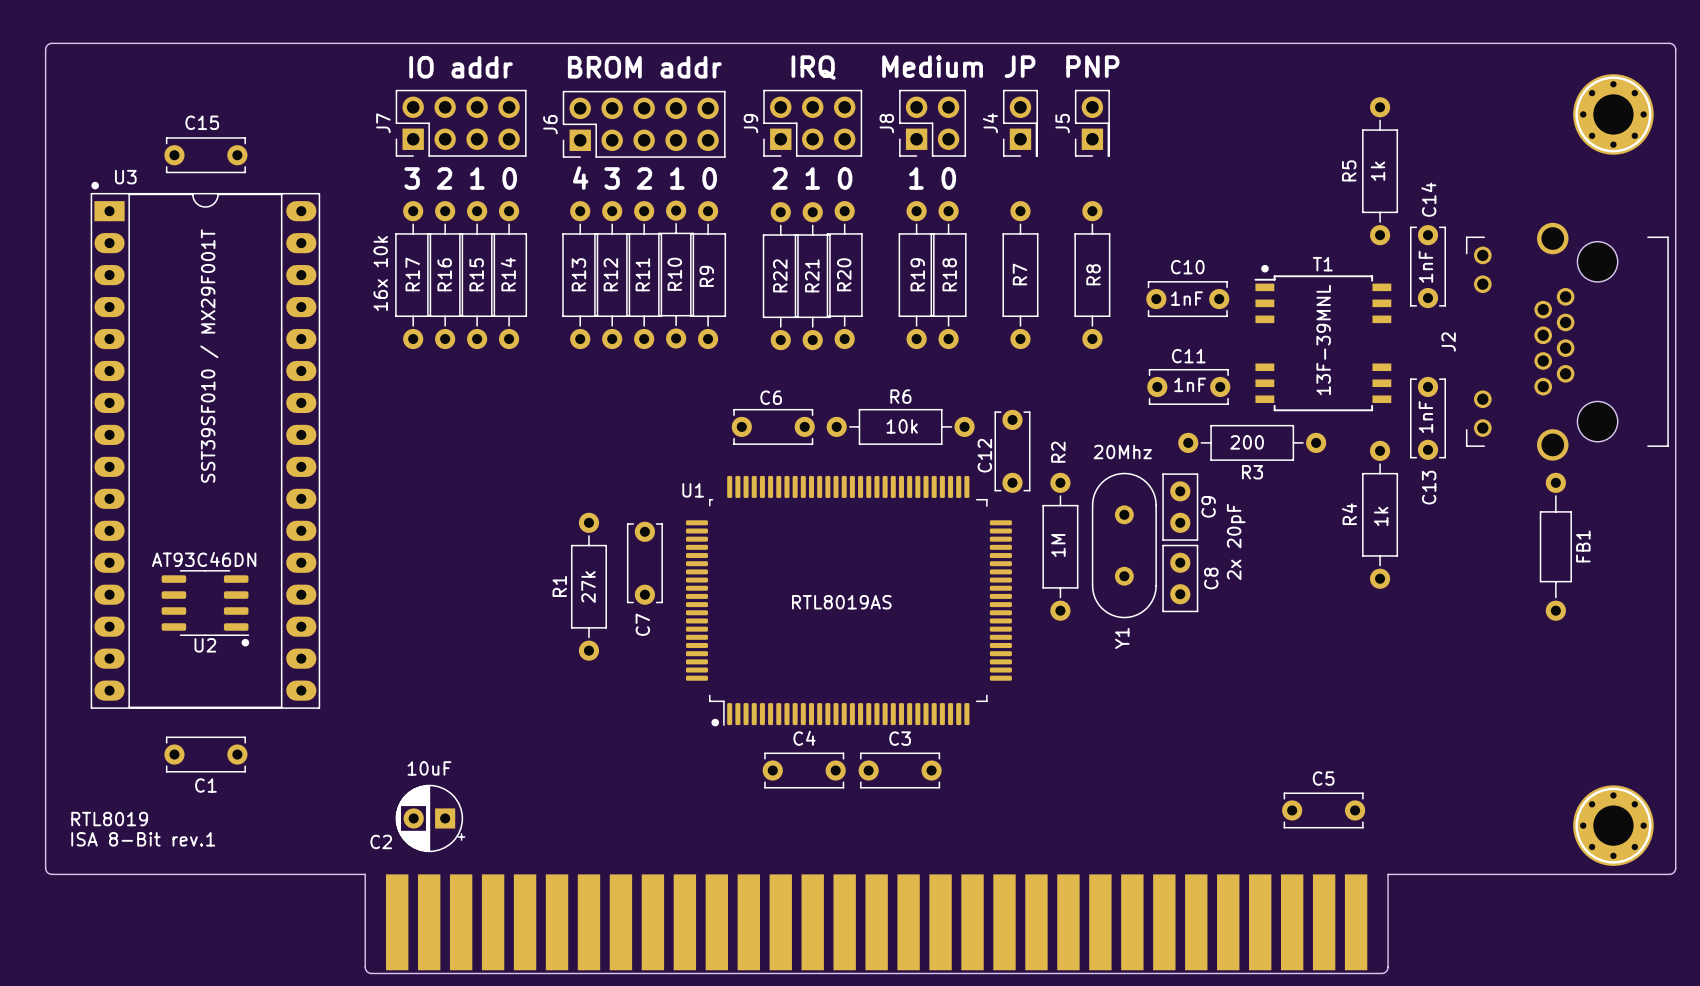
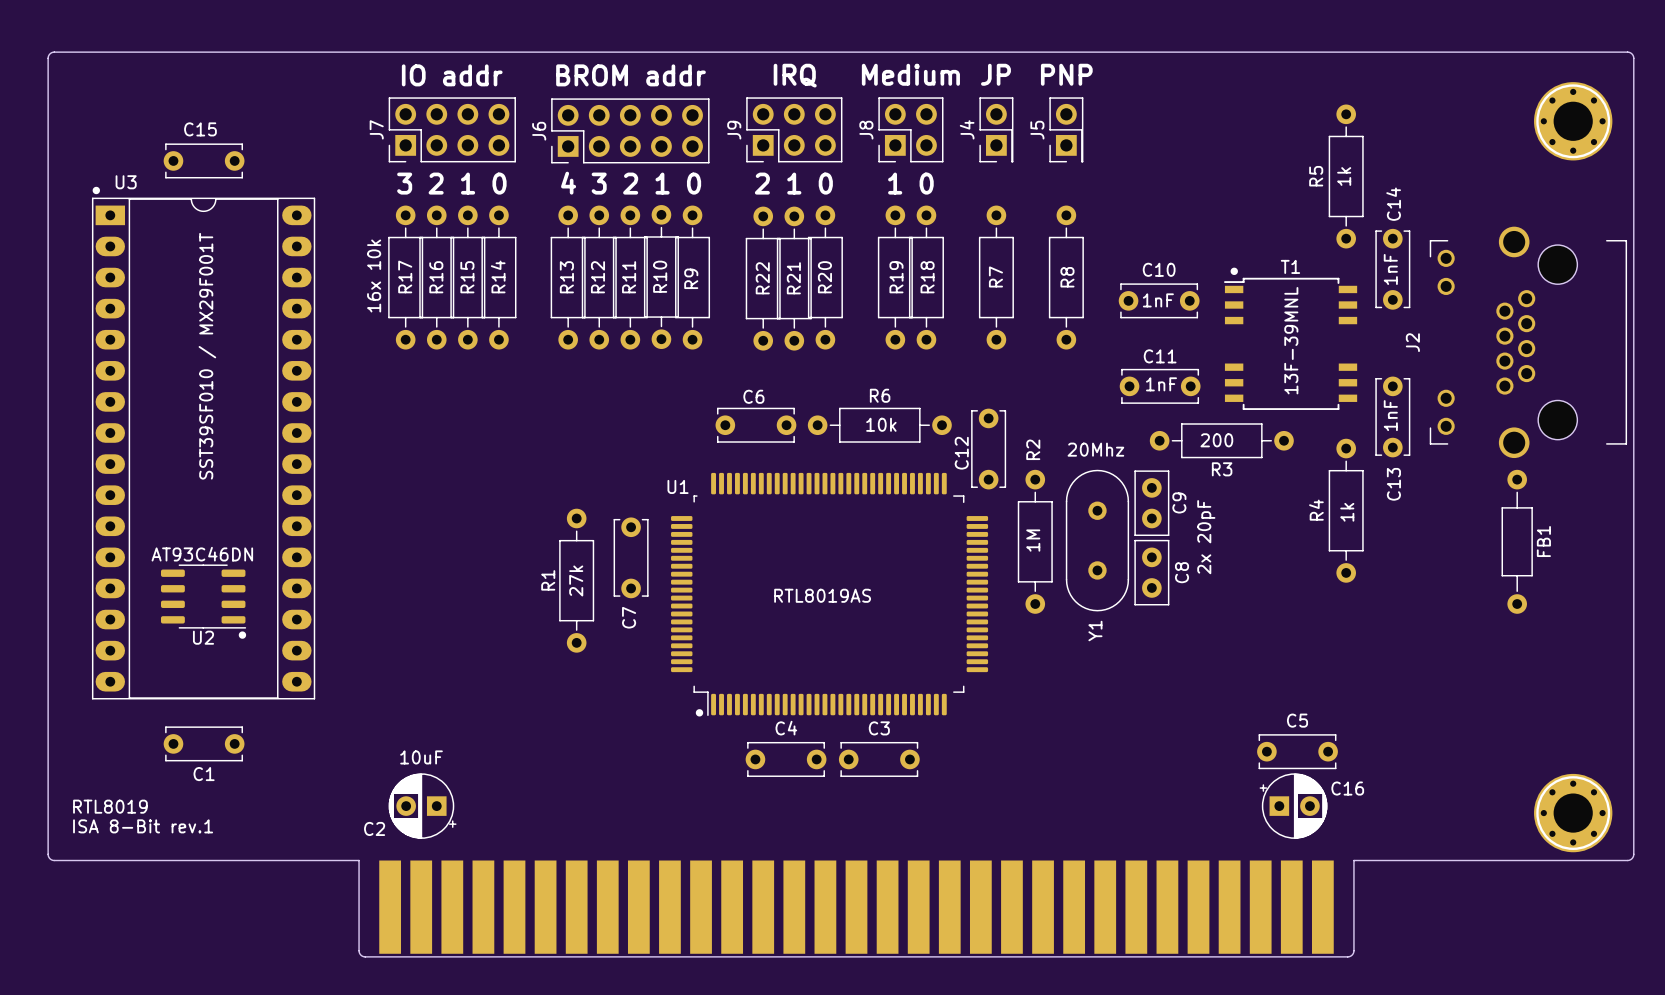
C5 position: (1323, 810) -> (1297, 751)
C16: none -> (1293, 806)

